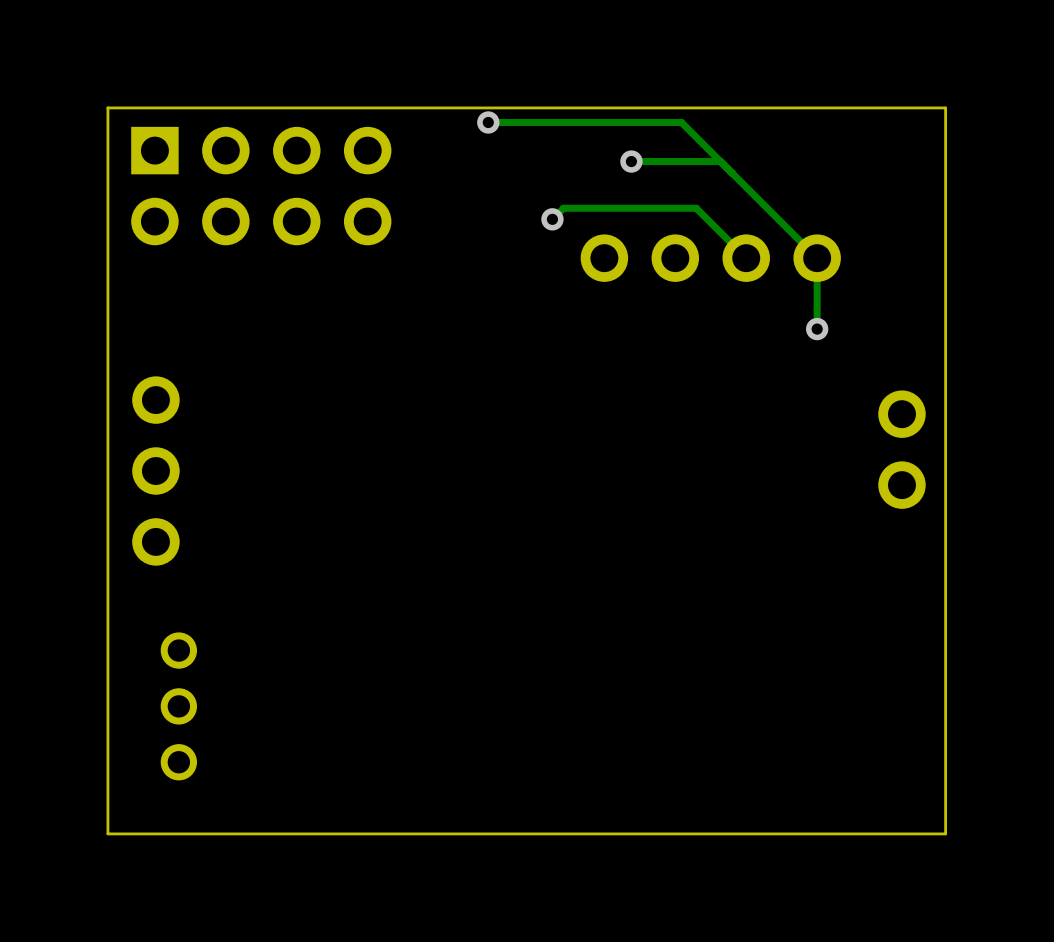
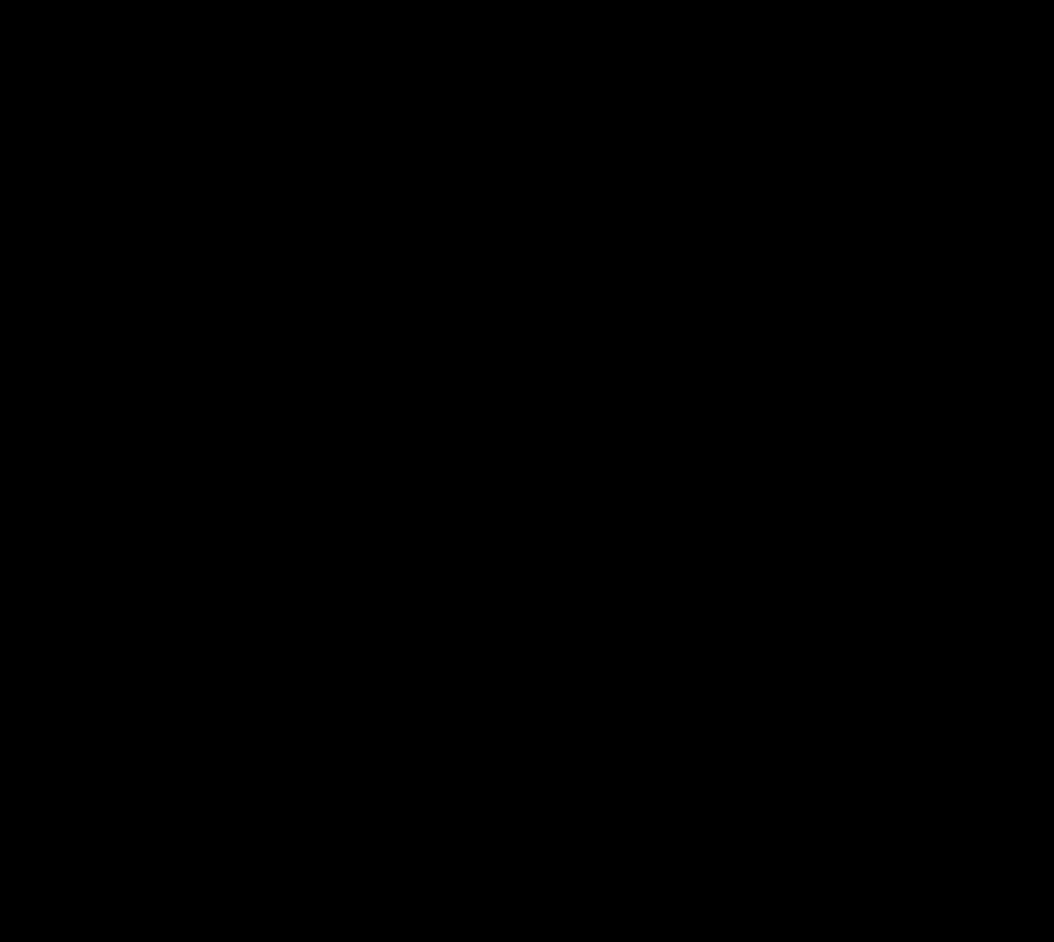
board edge: (945, 107) (107, 107) (107, 833) (945, 833) (945, 107) -> none
track: (488, 122) (681, 122) (817, 258) (817, 329) -> none
via: (488, 122) -> none
via: (631, 161) -> none
track: (720, 161) (631, 161) -> none
part: (261, 186) -> none
track: (552, 219) (563, 208) (696, 208) (746, 258) -> none
via: (552, 219) -> none
part: (604, 258) -> none
part: (675, 258) -> none
part: (746, 258) -> none
part: (817, 258) -> none
via: (817, 329) -> none
part: (155, 400) -> none
part: (901, 414) -> none
part: (155, 471) -> none
part: (901, 485) -> none
part: (155, 541) -> none
part: (178, 706) -> none

